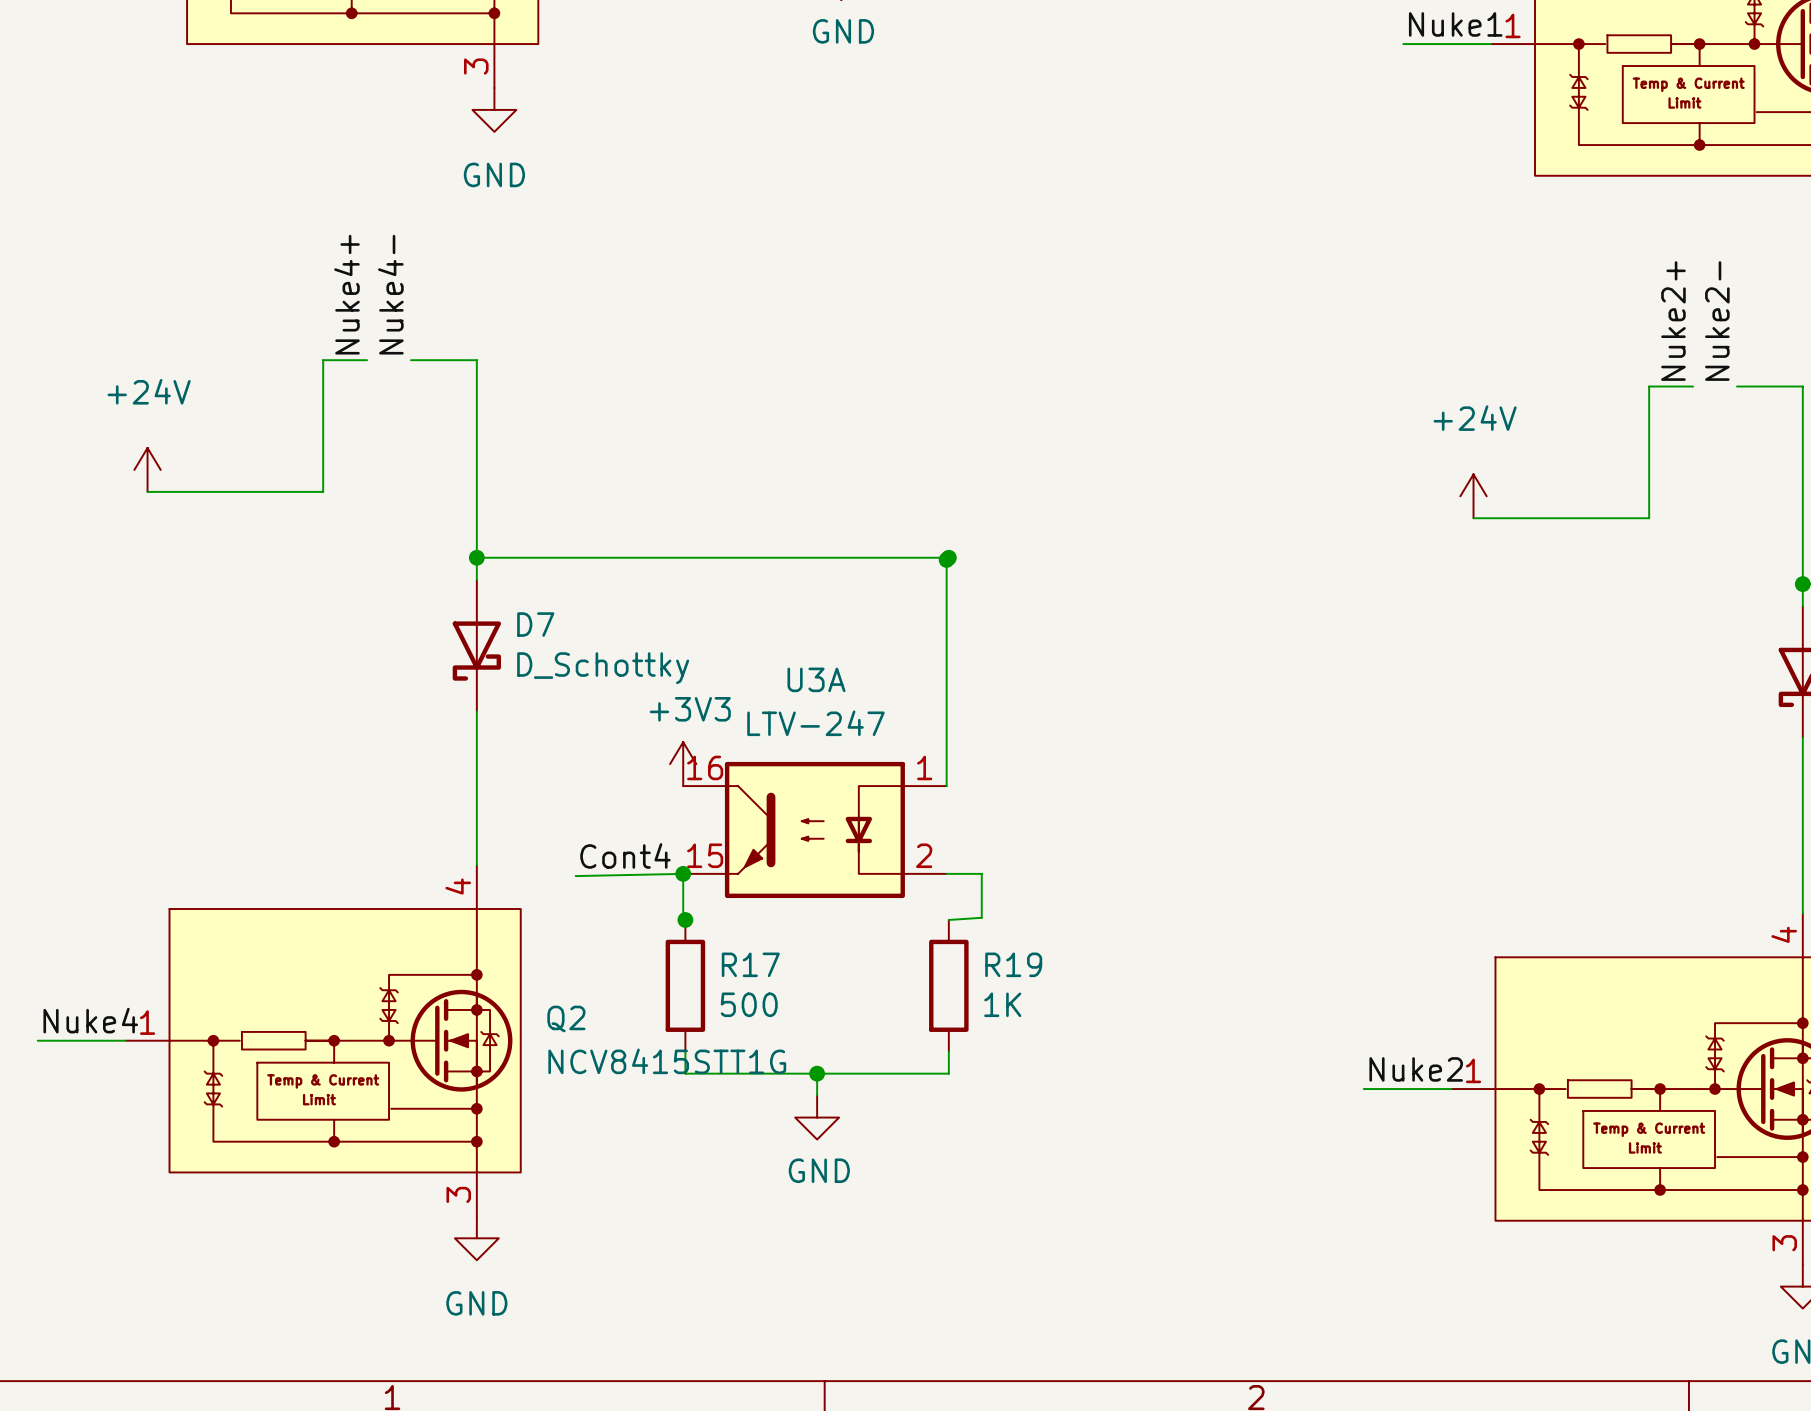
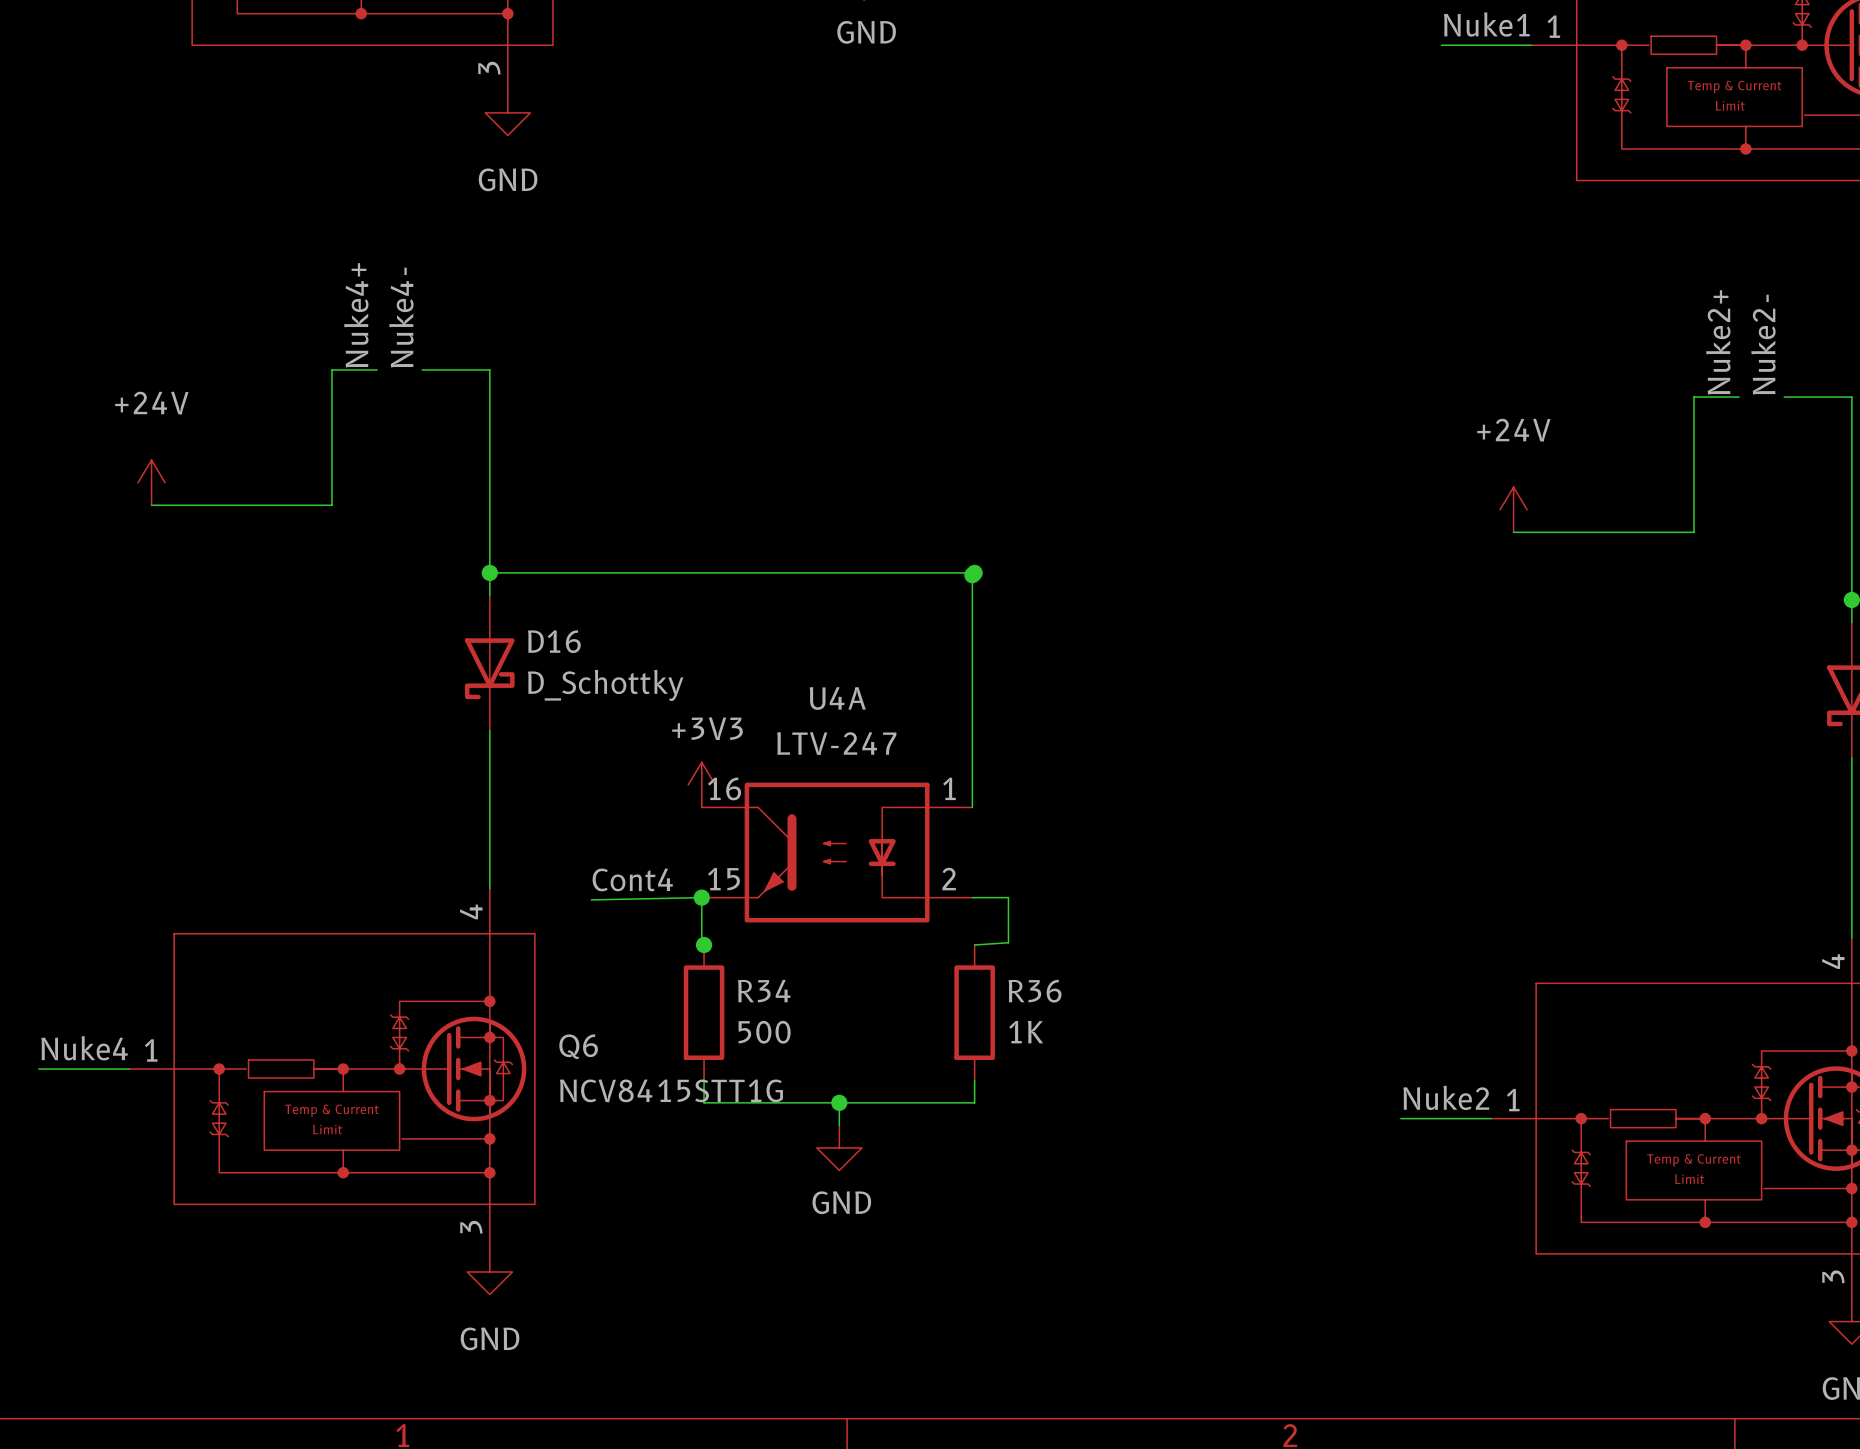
D7 name: D7 (535, 624) -> D16 (554, 641)
U3A name: U3A (816, 679) -> U4A (837, 698)
R17 name: R17 (750, 964) -> R34 (764, 991)
R19 name: R19 (1013, 964) -> R36 (1035, 991)
Q2 name: Q2 (566, 1018) -> Q6 (578, 1046)

